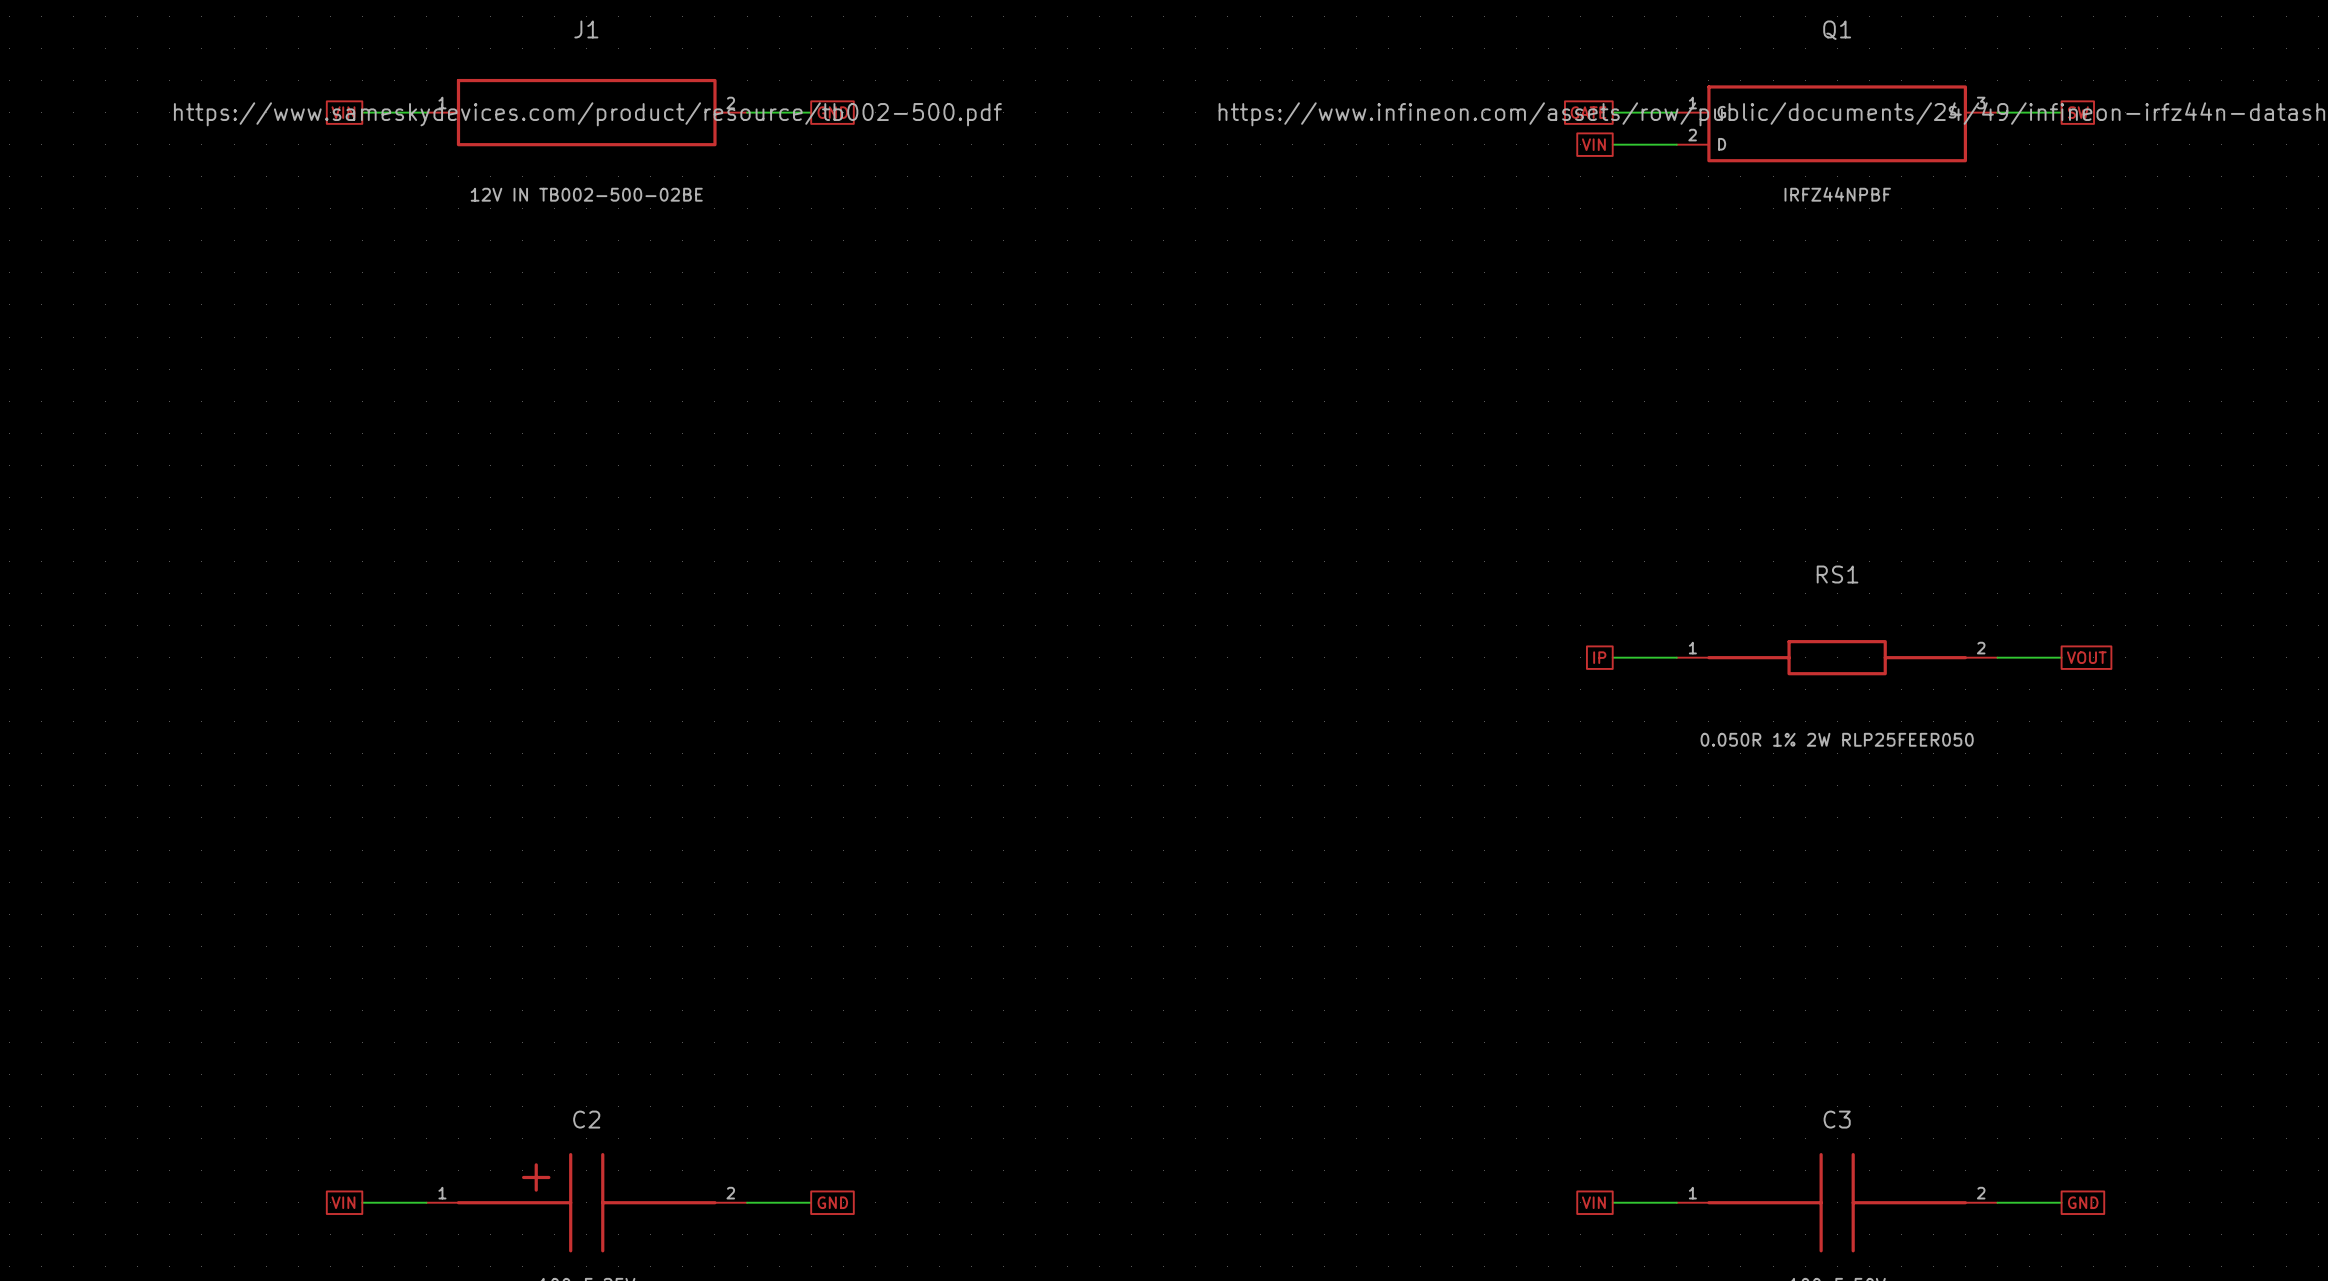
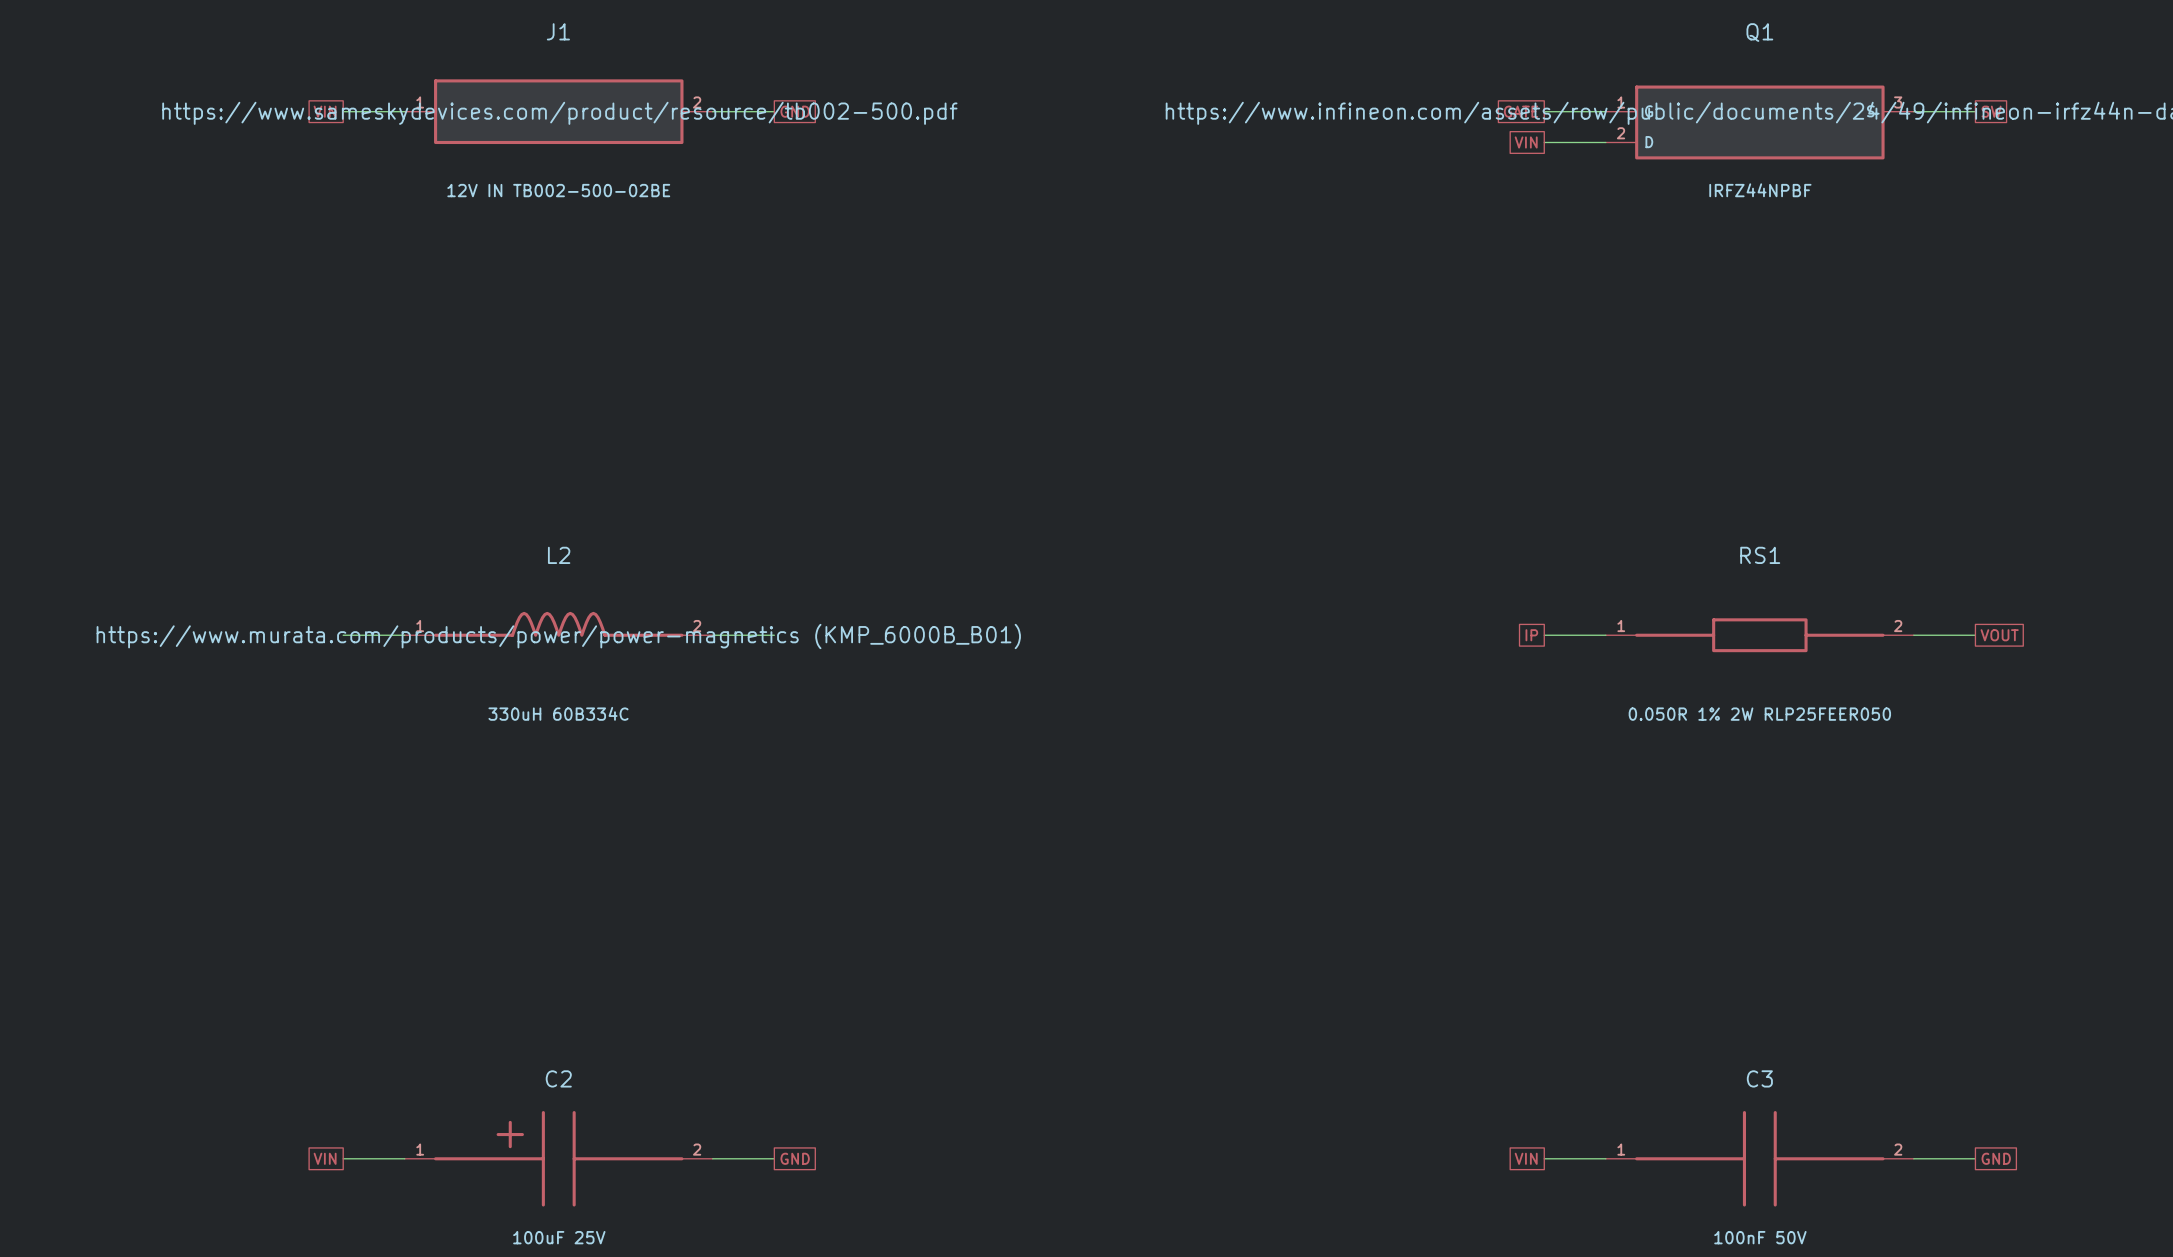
L2: none -> 330uH 60B334C (558, 624)
wire: none -> (343, 635) (404, 635)
wire: none -> (712, 635) (774, 635)

